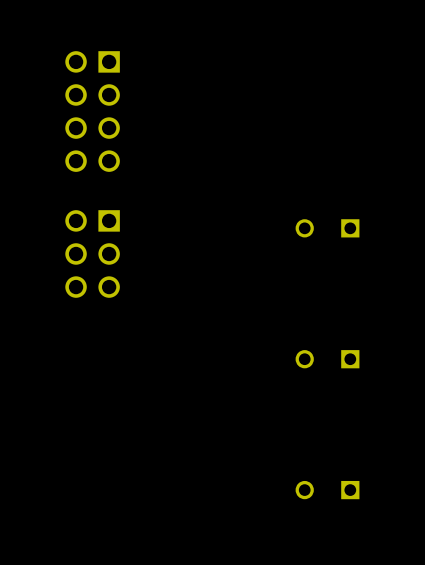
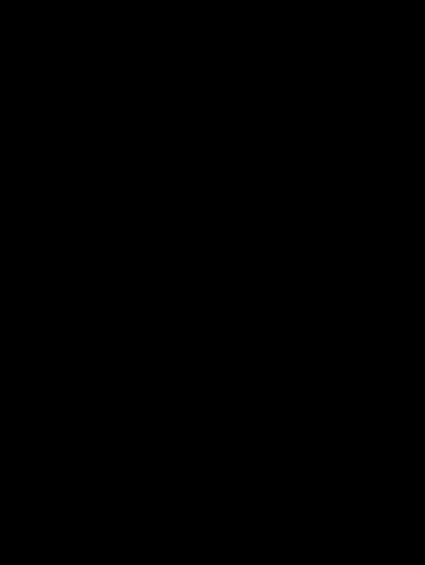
part: (92, 111) -> none
part: (327, 228) -> none
part: (92, 253) -> none
part: (327, 359) -> none
part: (327, 490) -> none

